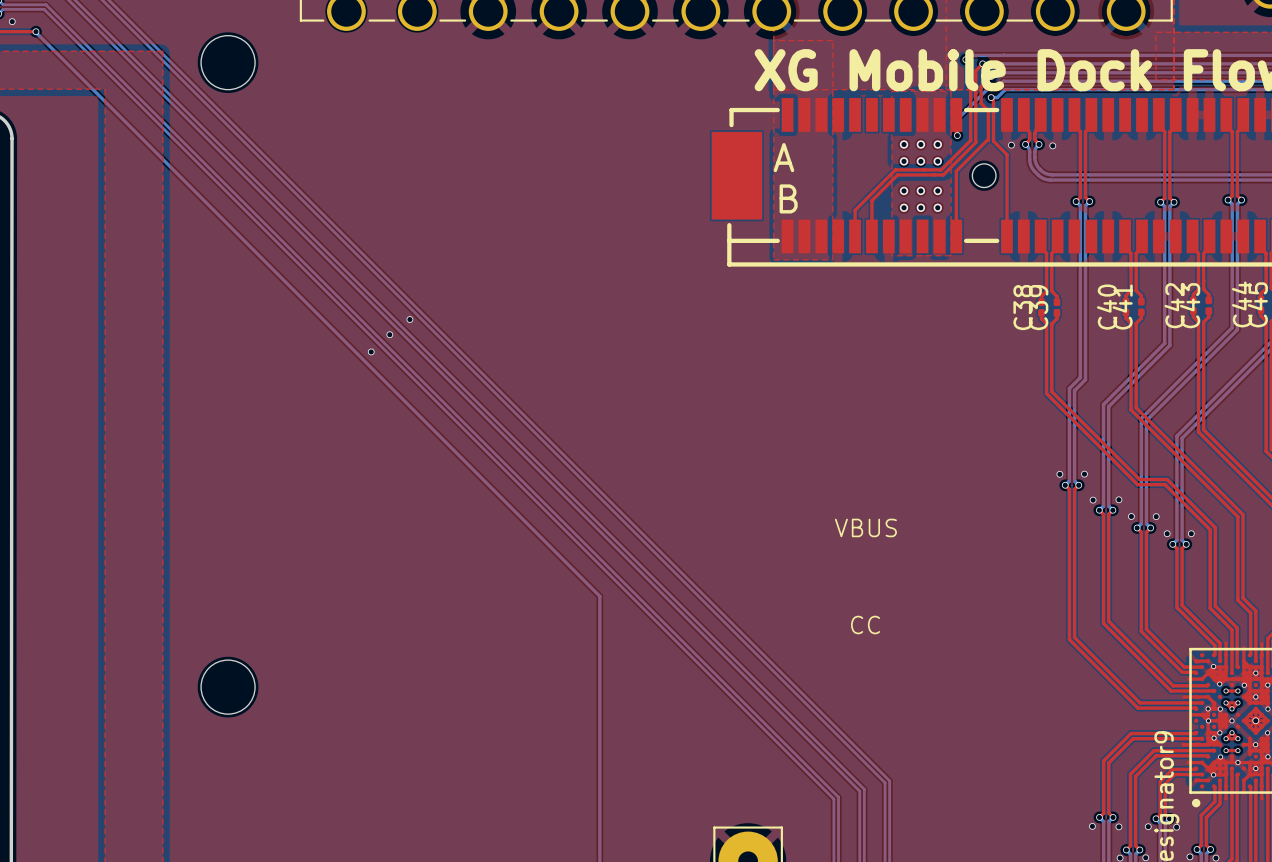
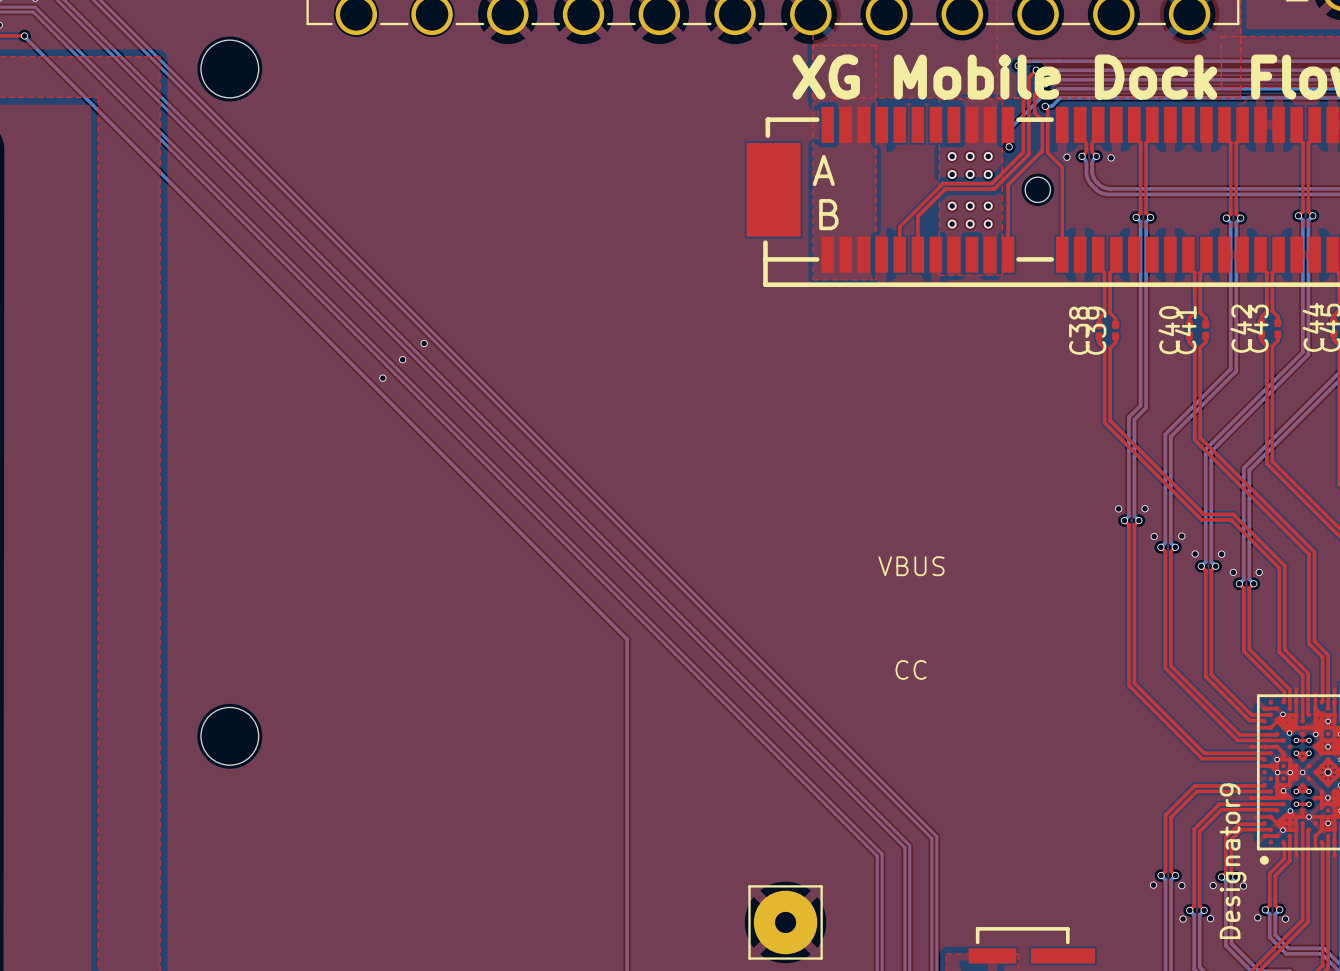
via: (1231, 708) -> none
via: (1220, 709) -> none
via: none -> (1290, 772)
via: (1219, 732) -> none
via: (1231, 732) -> none

